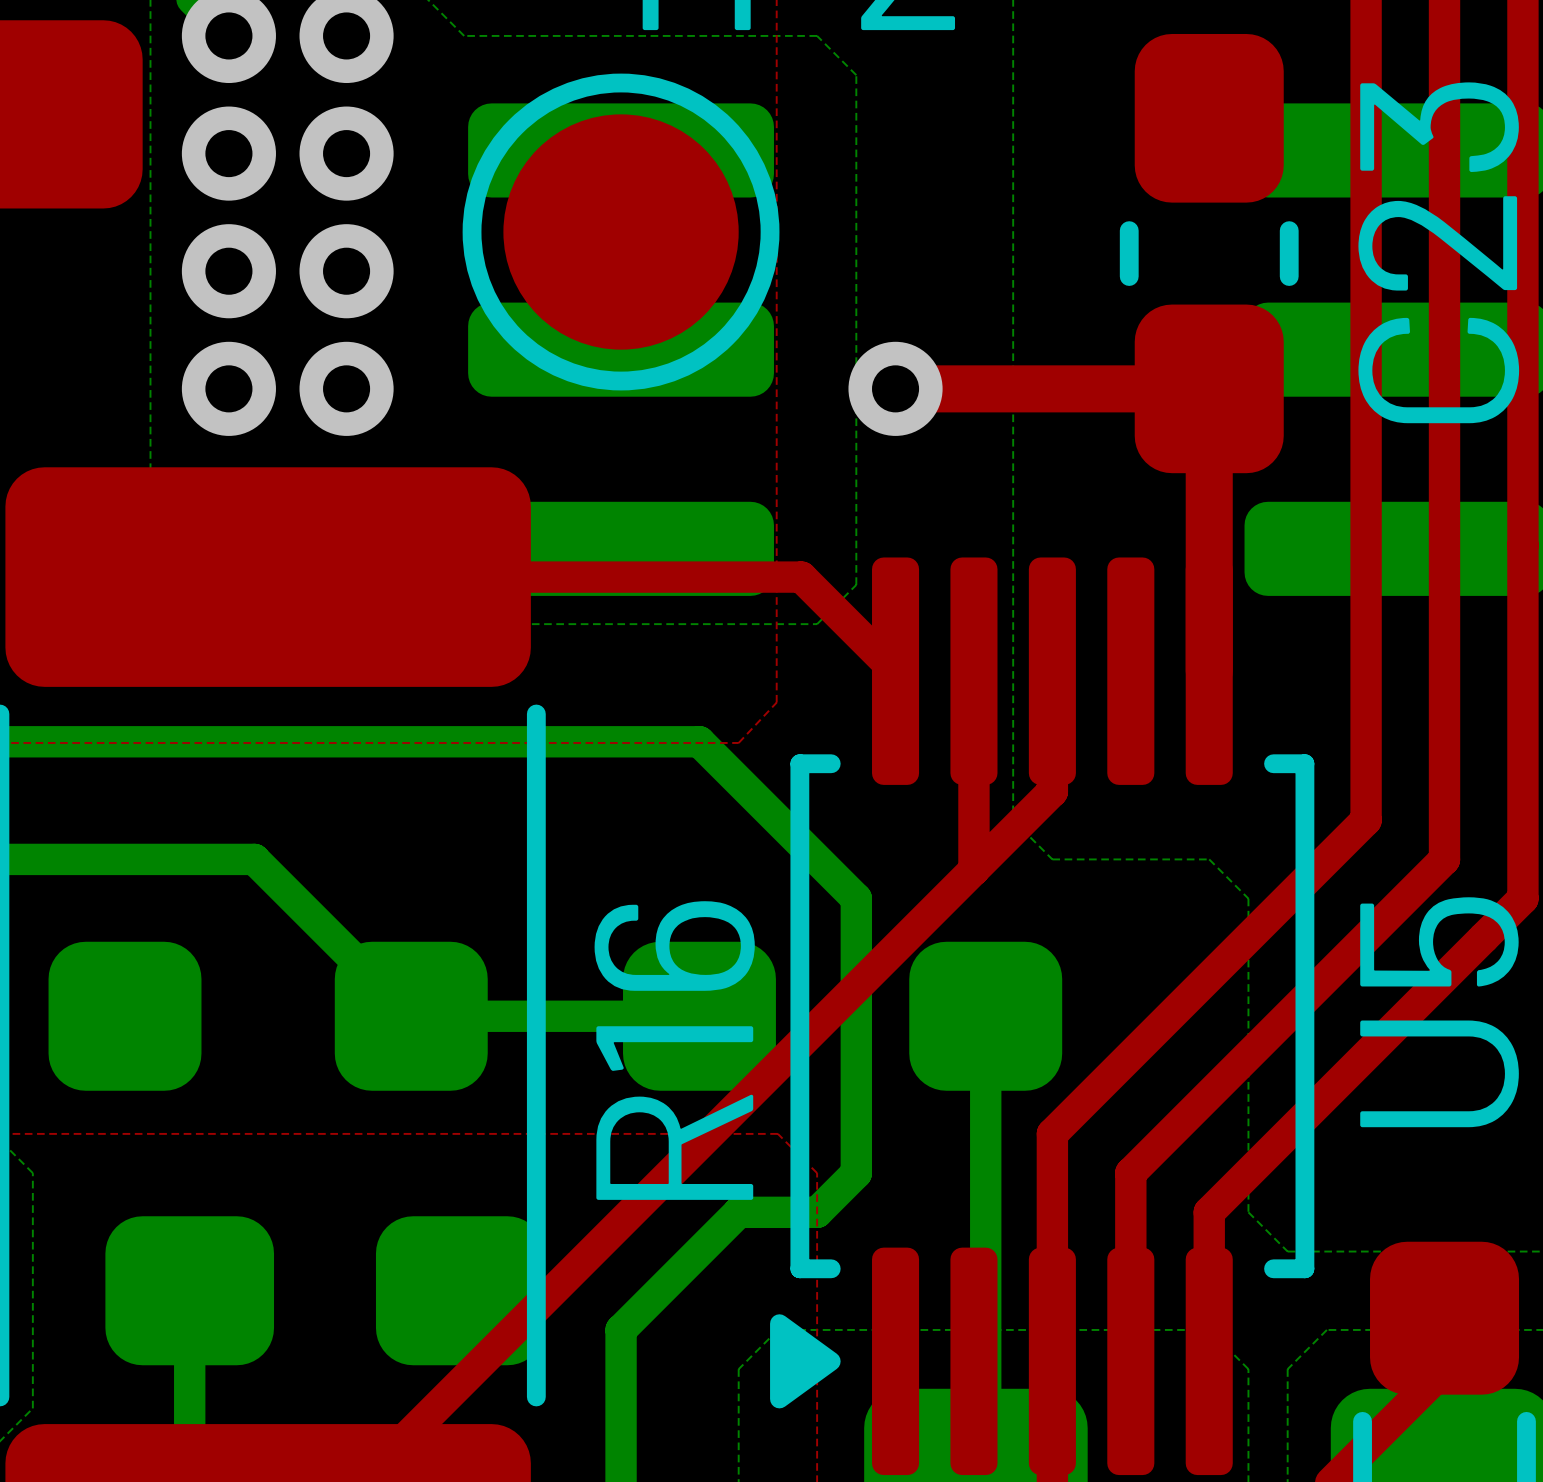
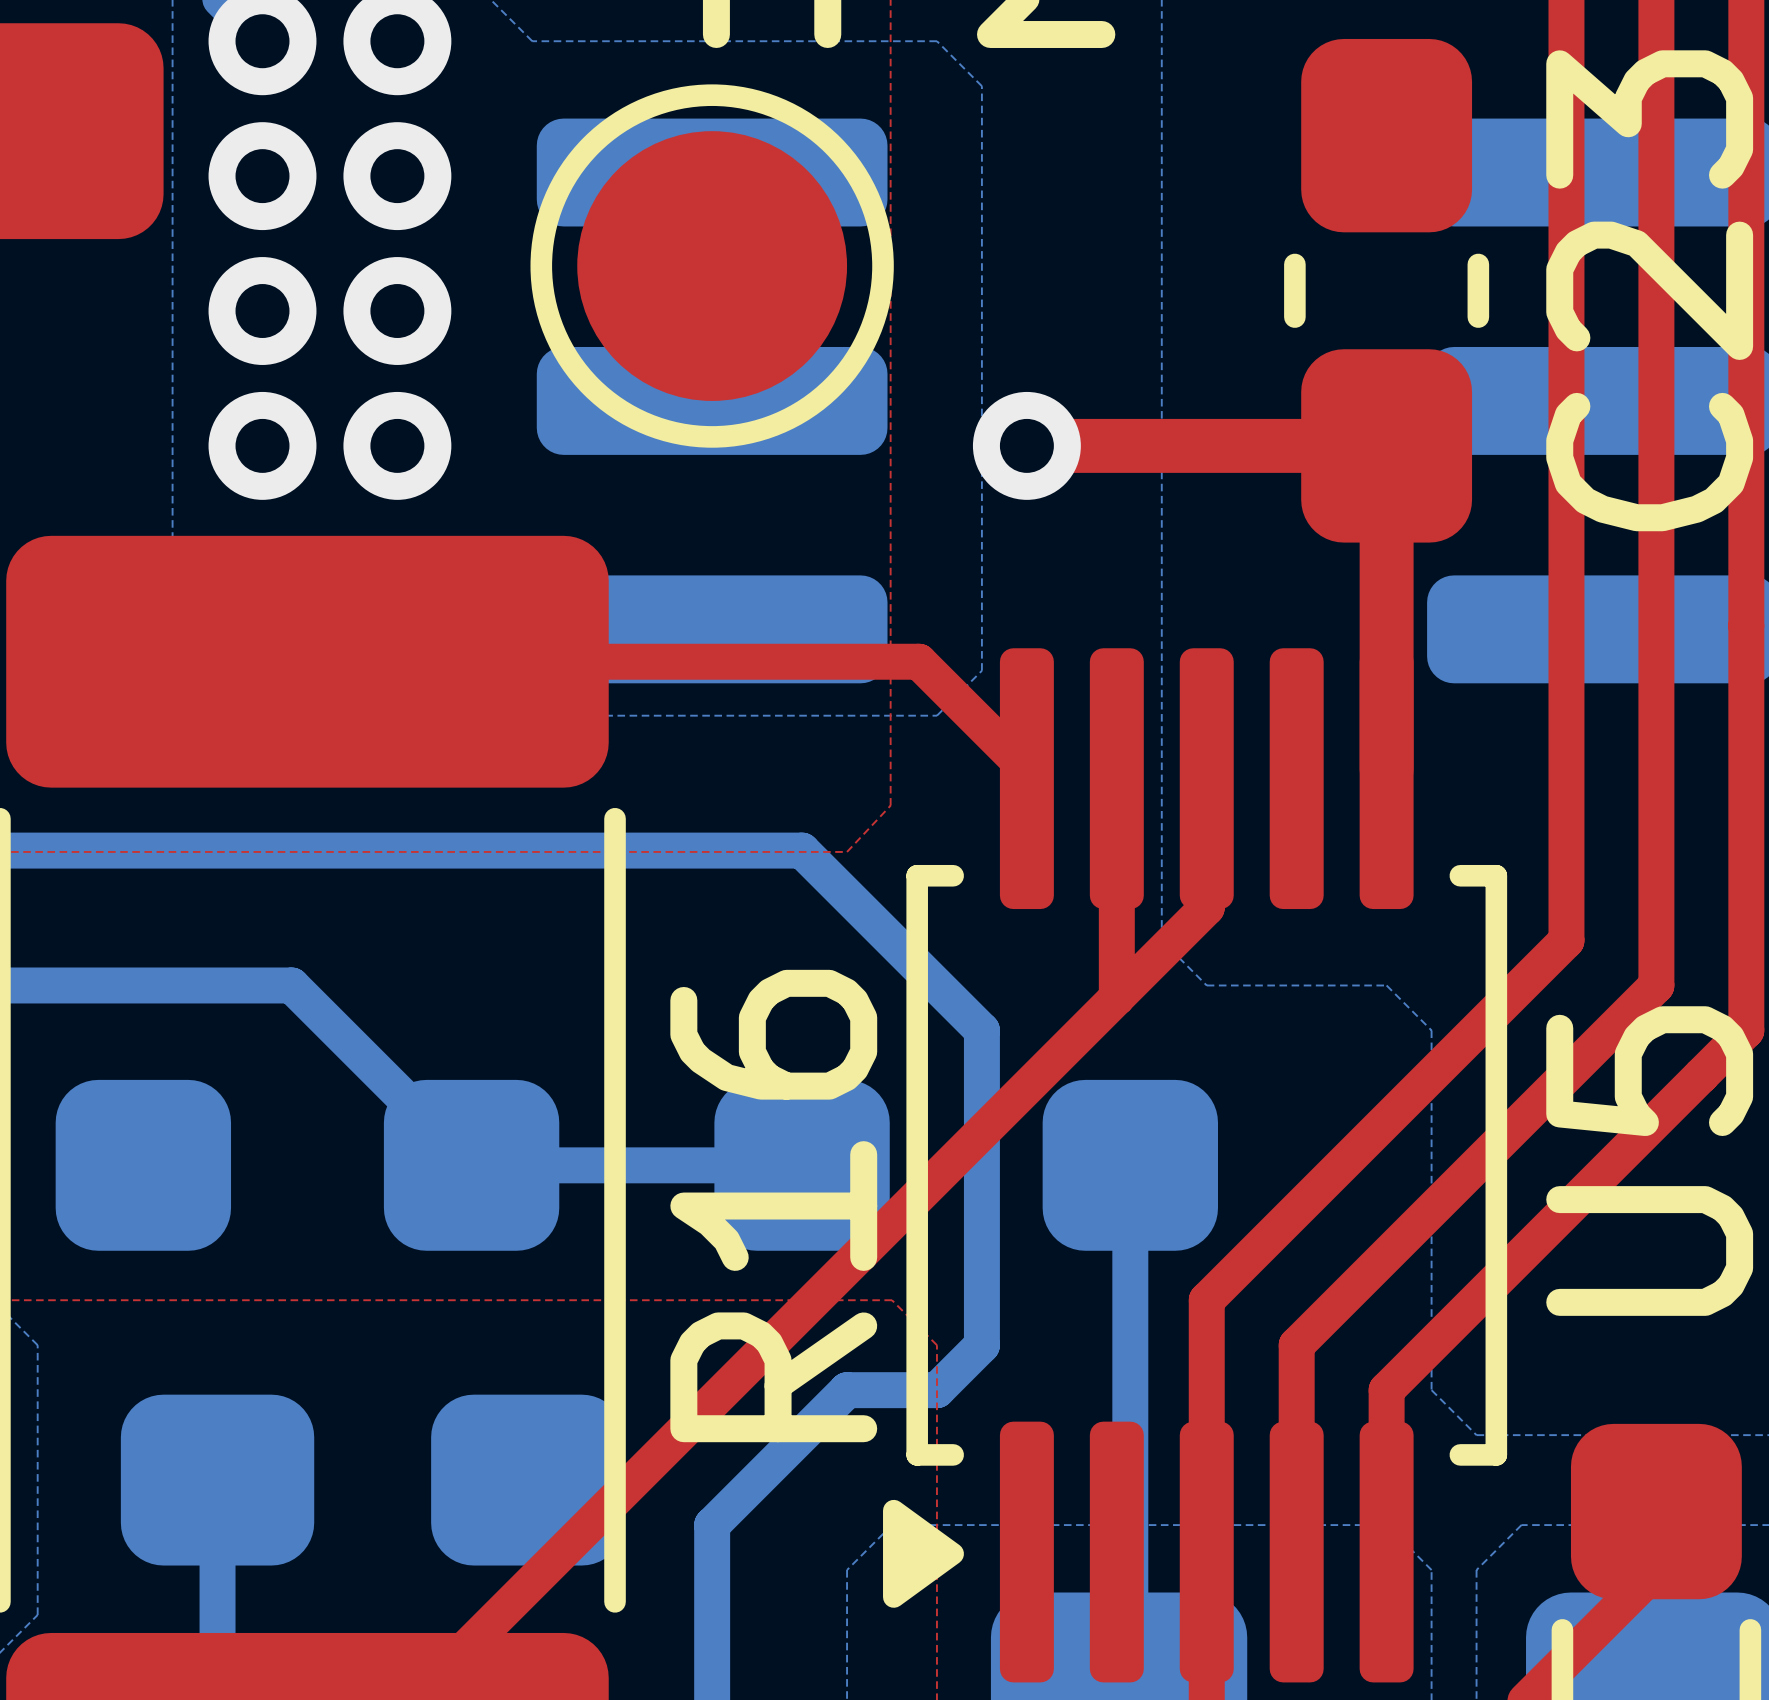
U5 footprint: [770, 557, 1315, 1476] -> [883, 648, 1508, 1683]

